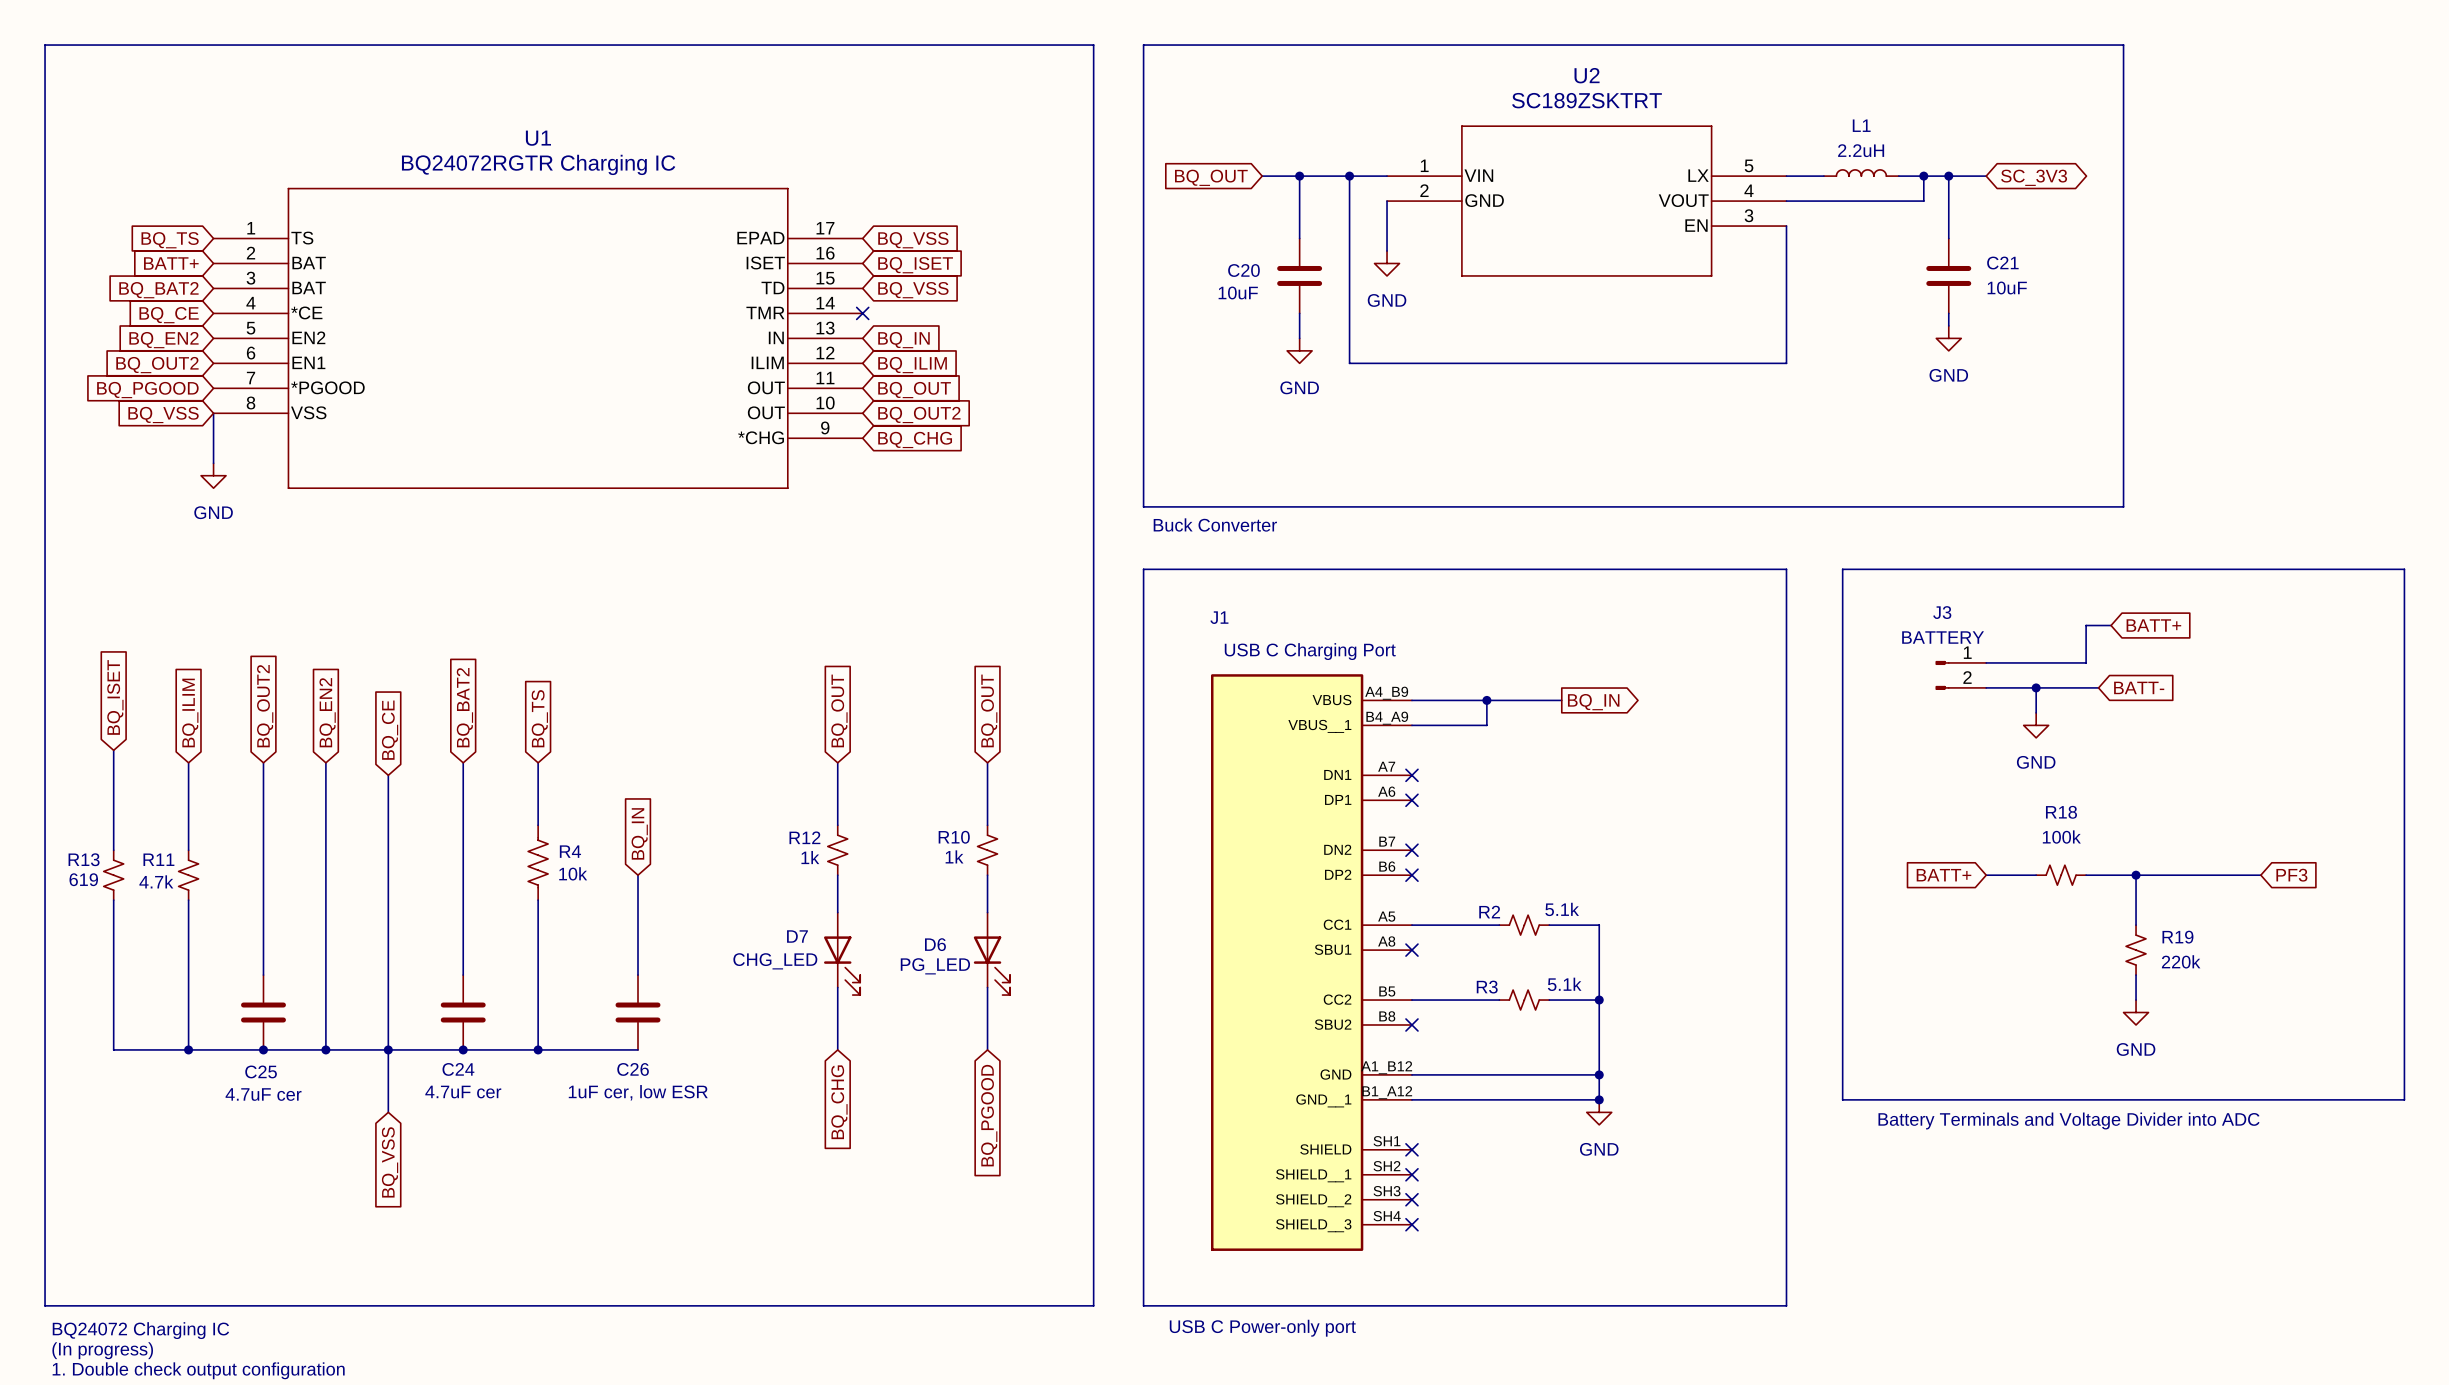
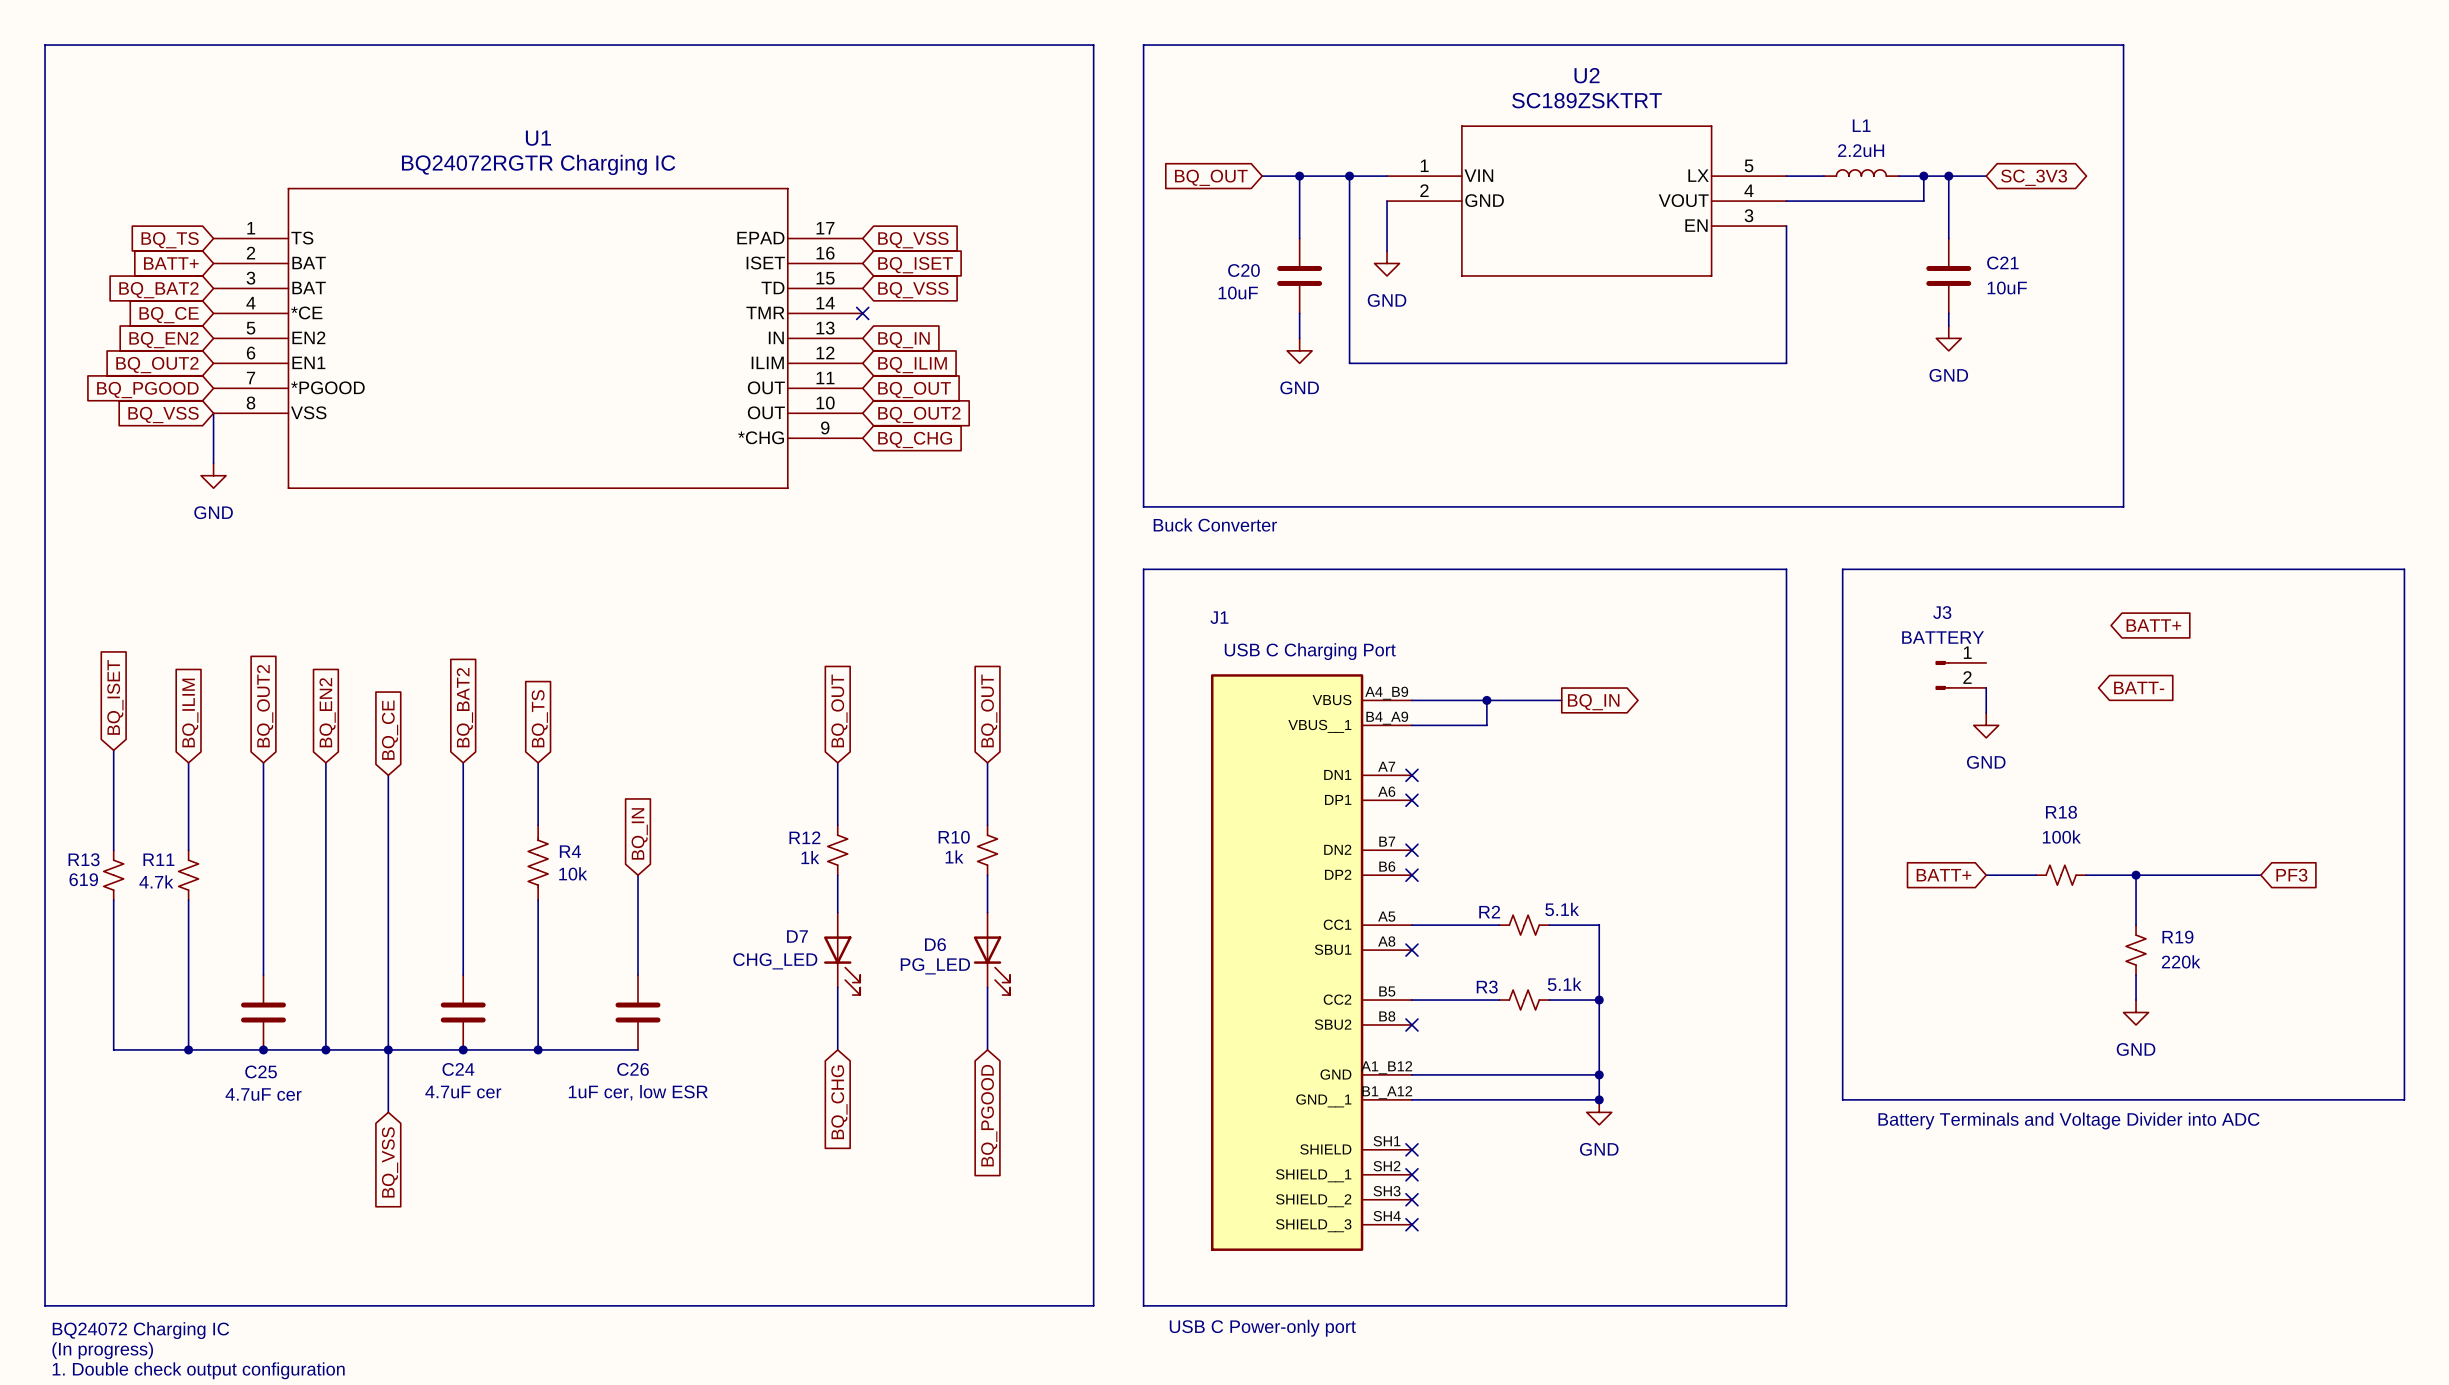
wire: (2111, 625) (2086, 625) (2086, 662) (1986, 662) -> none
wire: (1986, 687) (2098, 687) -> (1986, 687) (1986, 712)
wire: (2036, 687) (2036, 712) -> none
junction: (2036, 687) -> none
power symbol position: GND (2036, 725) -> GND (1986, 725)

